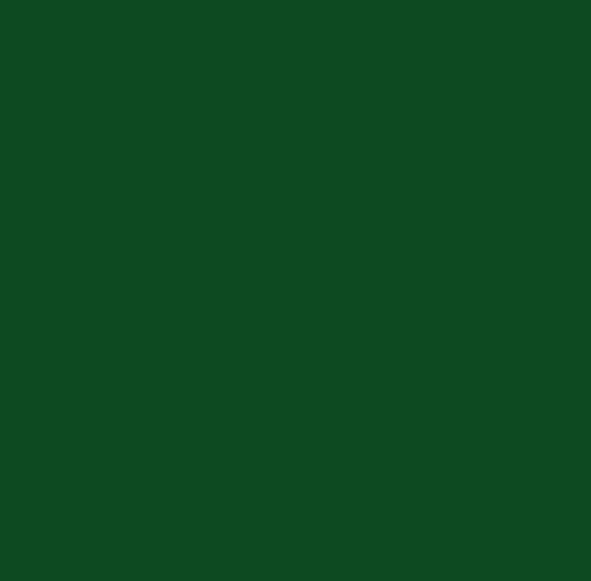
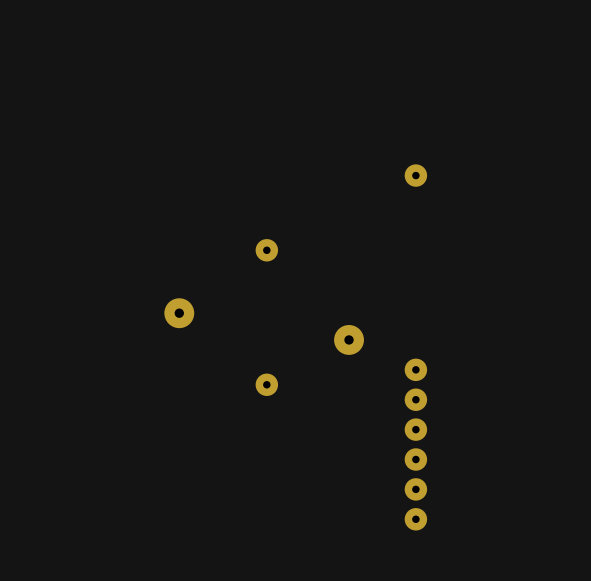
via: none -> (415, 175)
via: none -> (266, 250)
via: none -> (179, 313)
via: none -> (349, 339)
via: none -> (415, 369)
via: none -> (266, 384)
via: none -> (415, 399)
via: none -> (415, 429)
via: none -> (415, 459)
via: none -> (415, 489)
via: none -> (415, 519)

